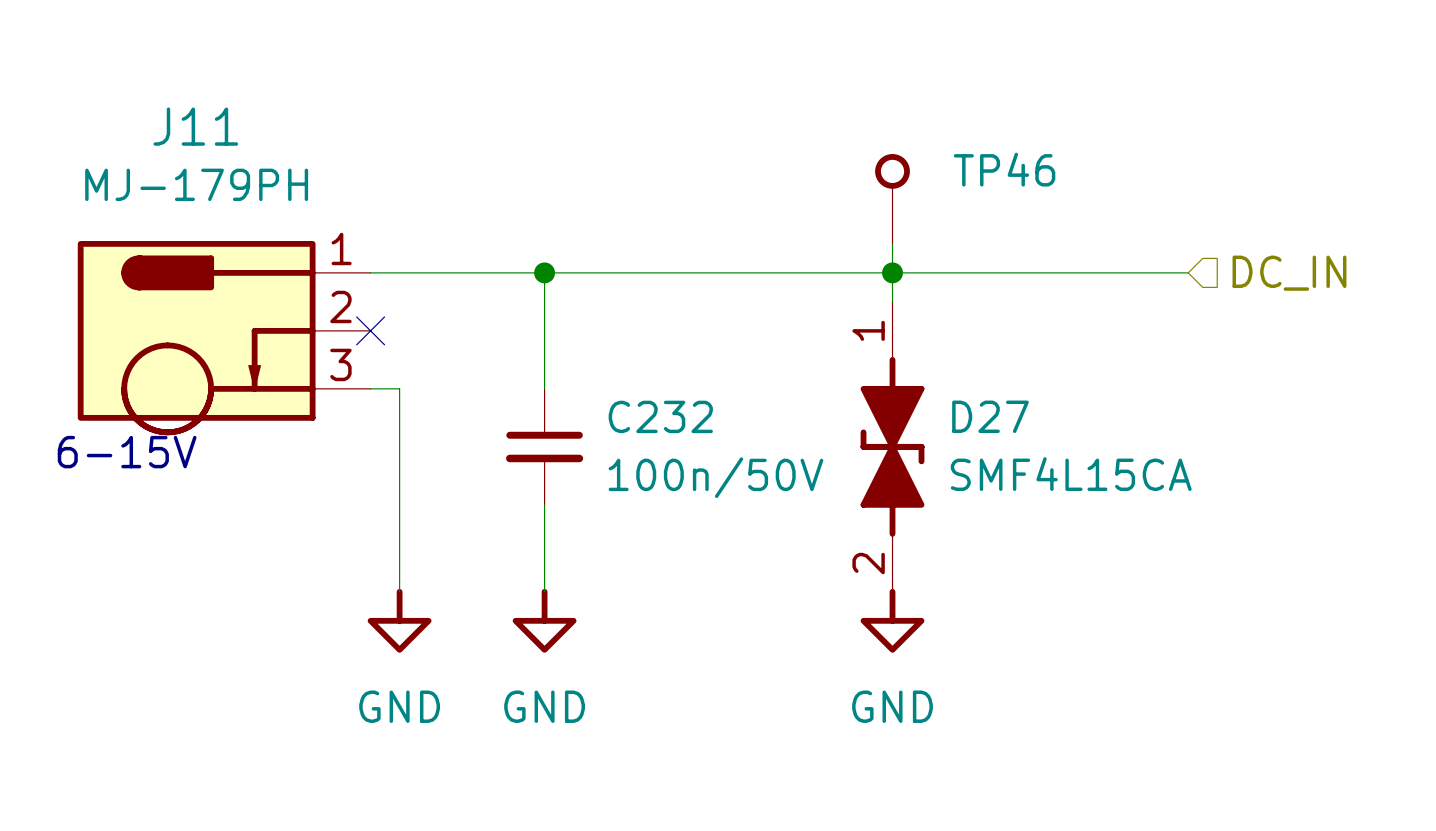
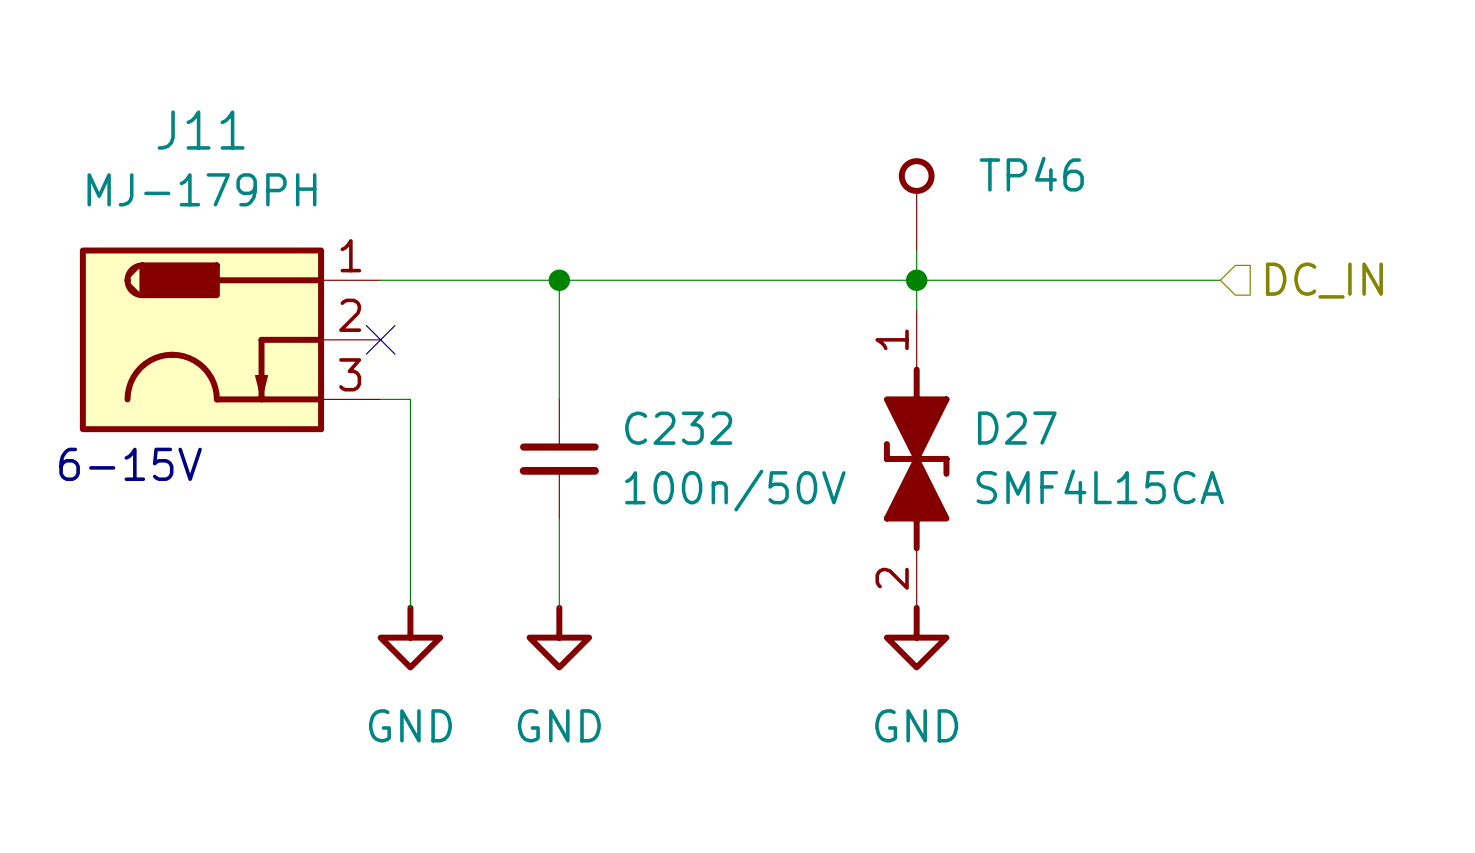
J11 symbol: [77, 241, 371, 436] -> [79, 247, 381, 433]

